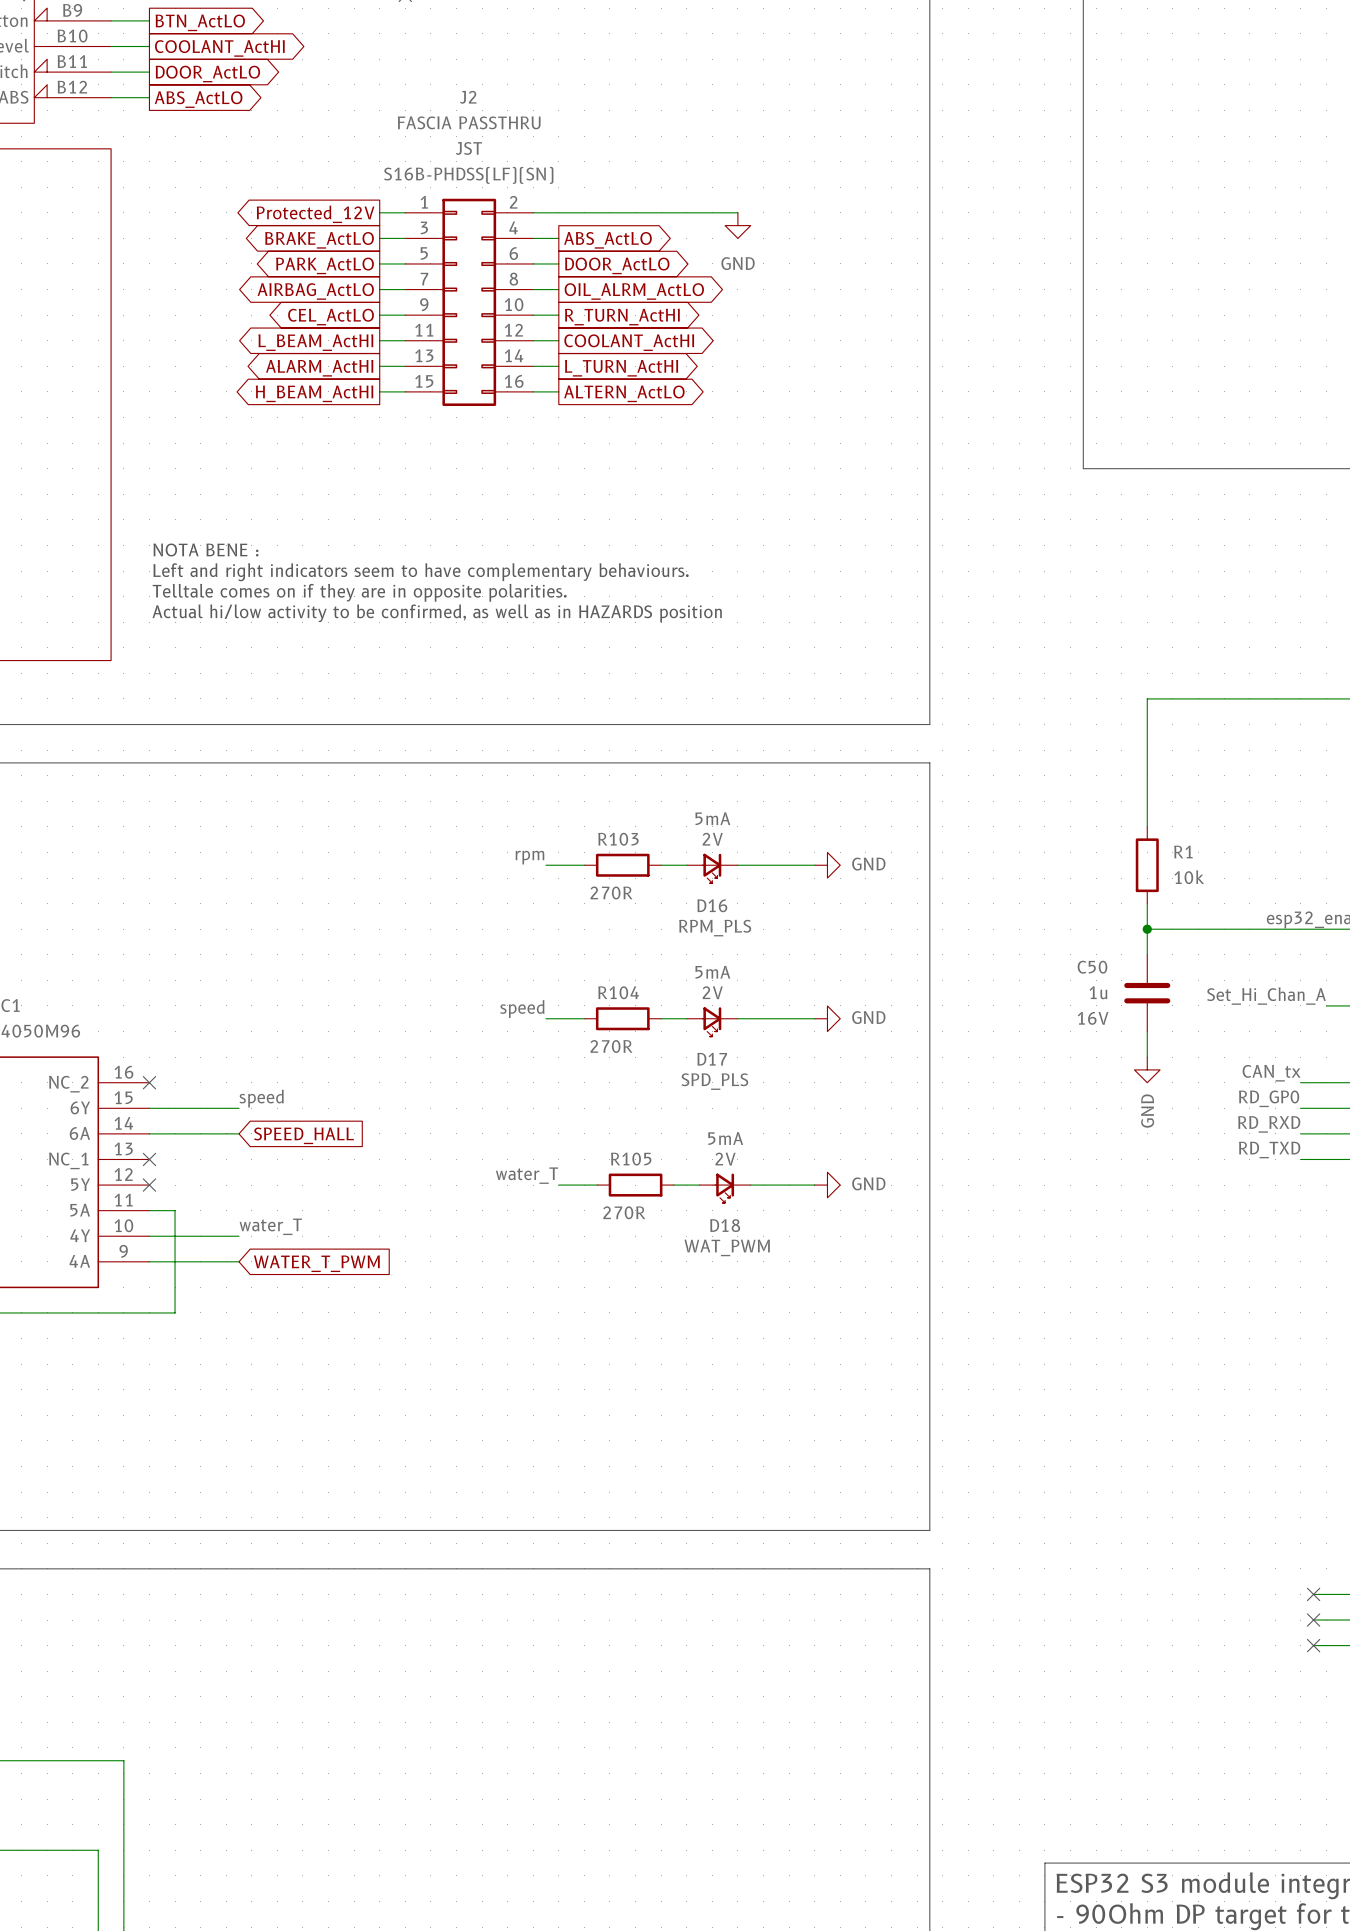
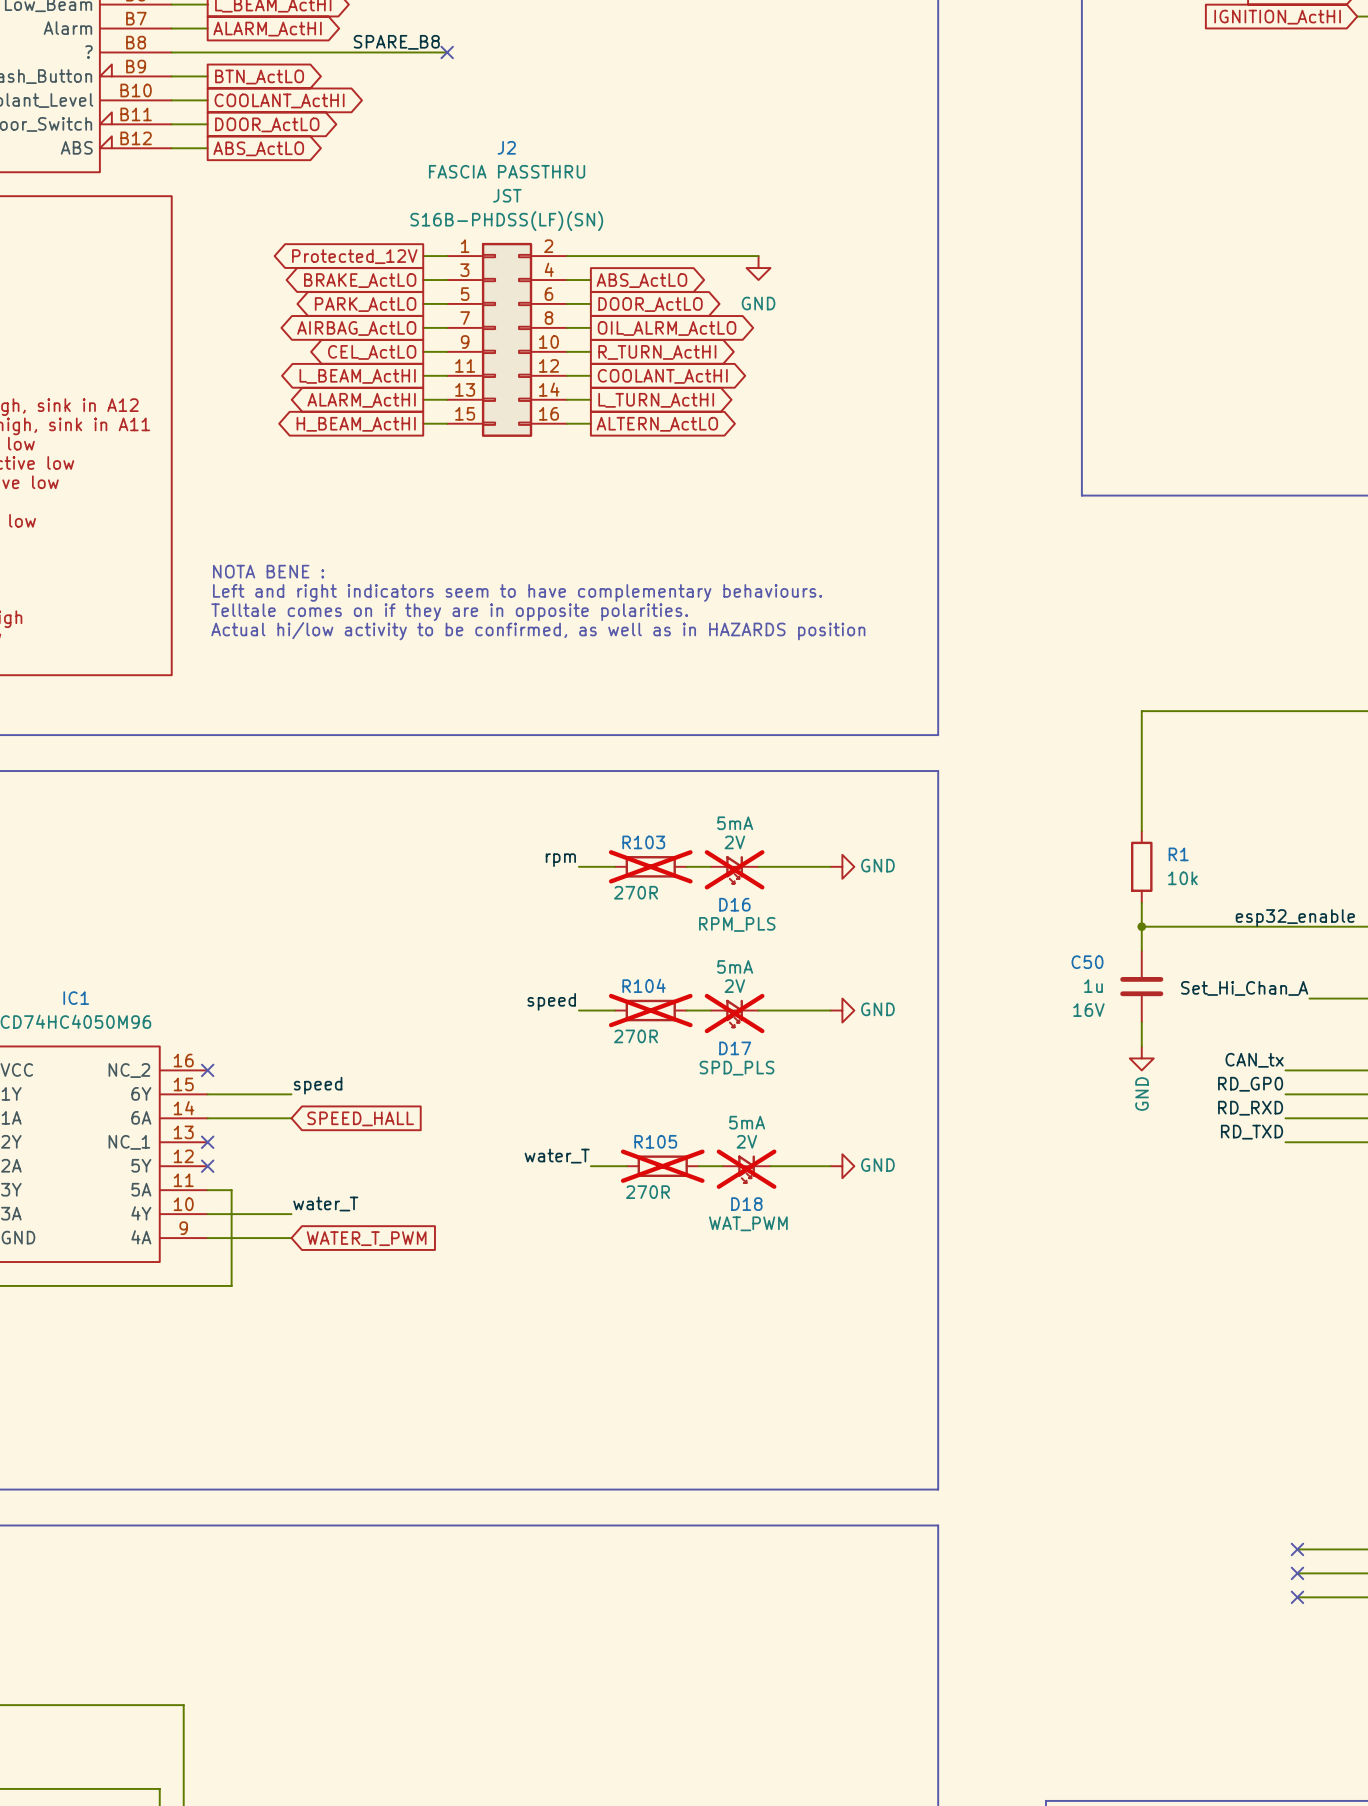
R103 do-not-place cross: none -> (650, 866)
D16 do-not-place cross: none -> (734, 869)
R104 do-not-place cross: none -> (650, 1010)
D17 do-not-place cross: none -> (734, 1013)
R105 do-not-place cross: none -> (662, 1166)
D18 do-not-place cross: none -> (746, 1169)

